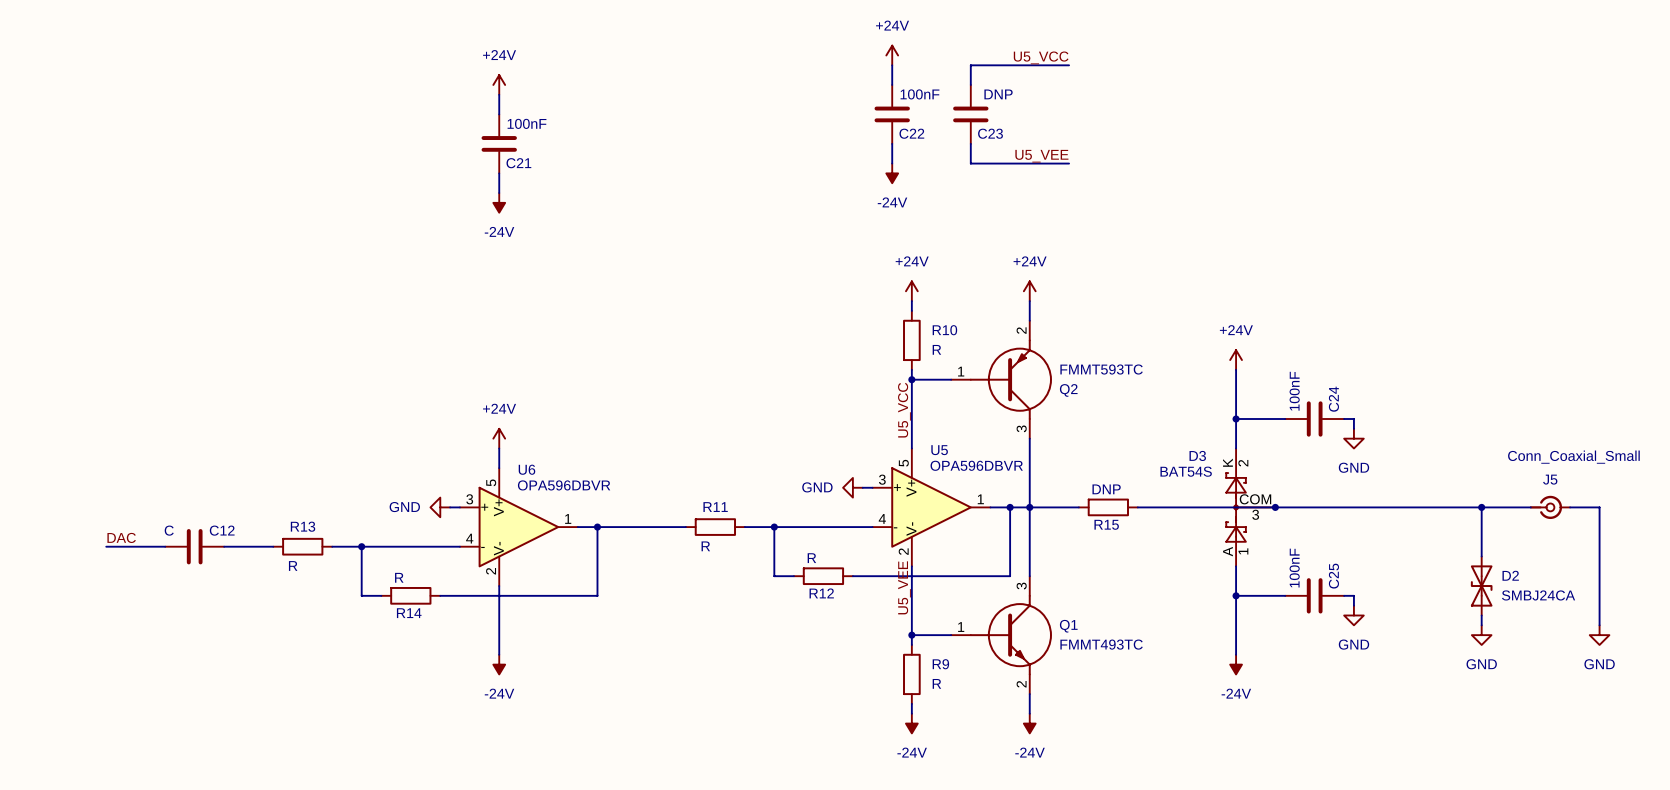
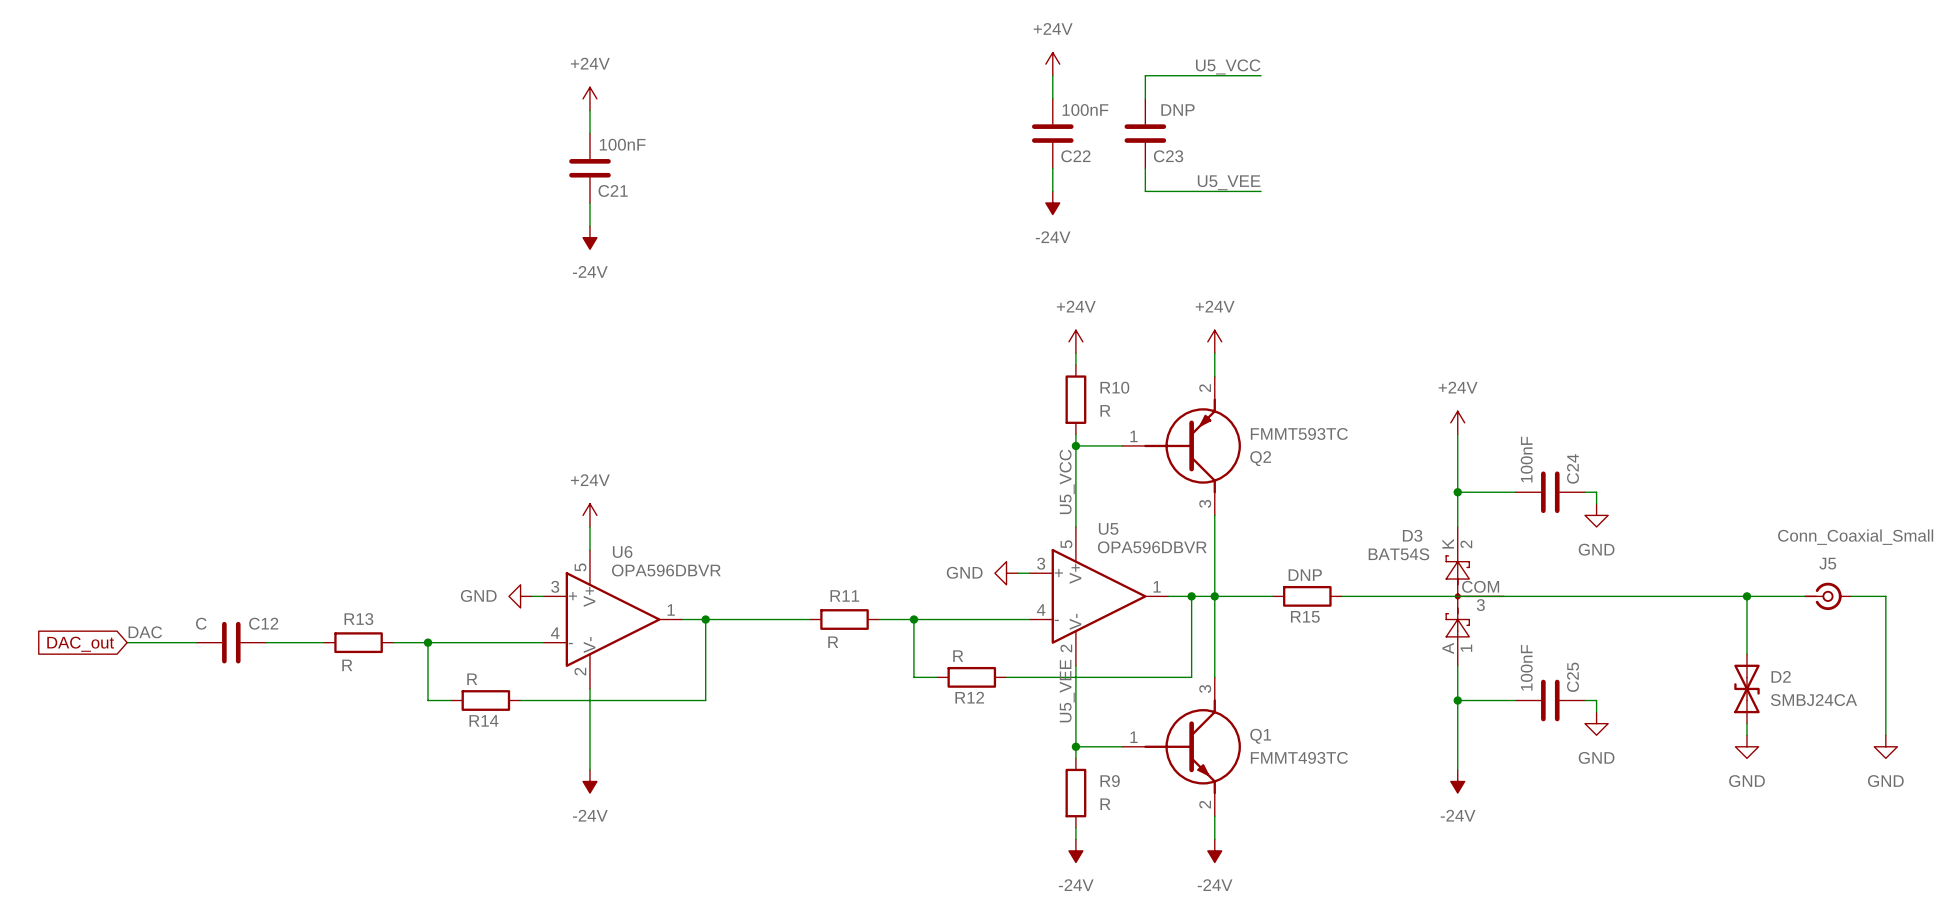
junction: (1275, 507) -> none
global label: none -> DAC_out (80, 644)

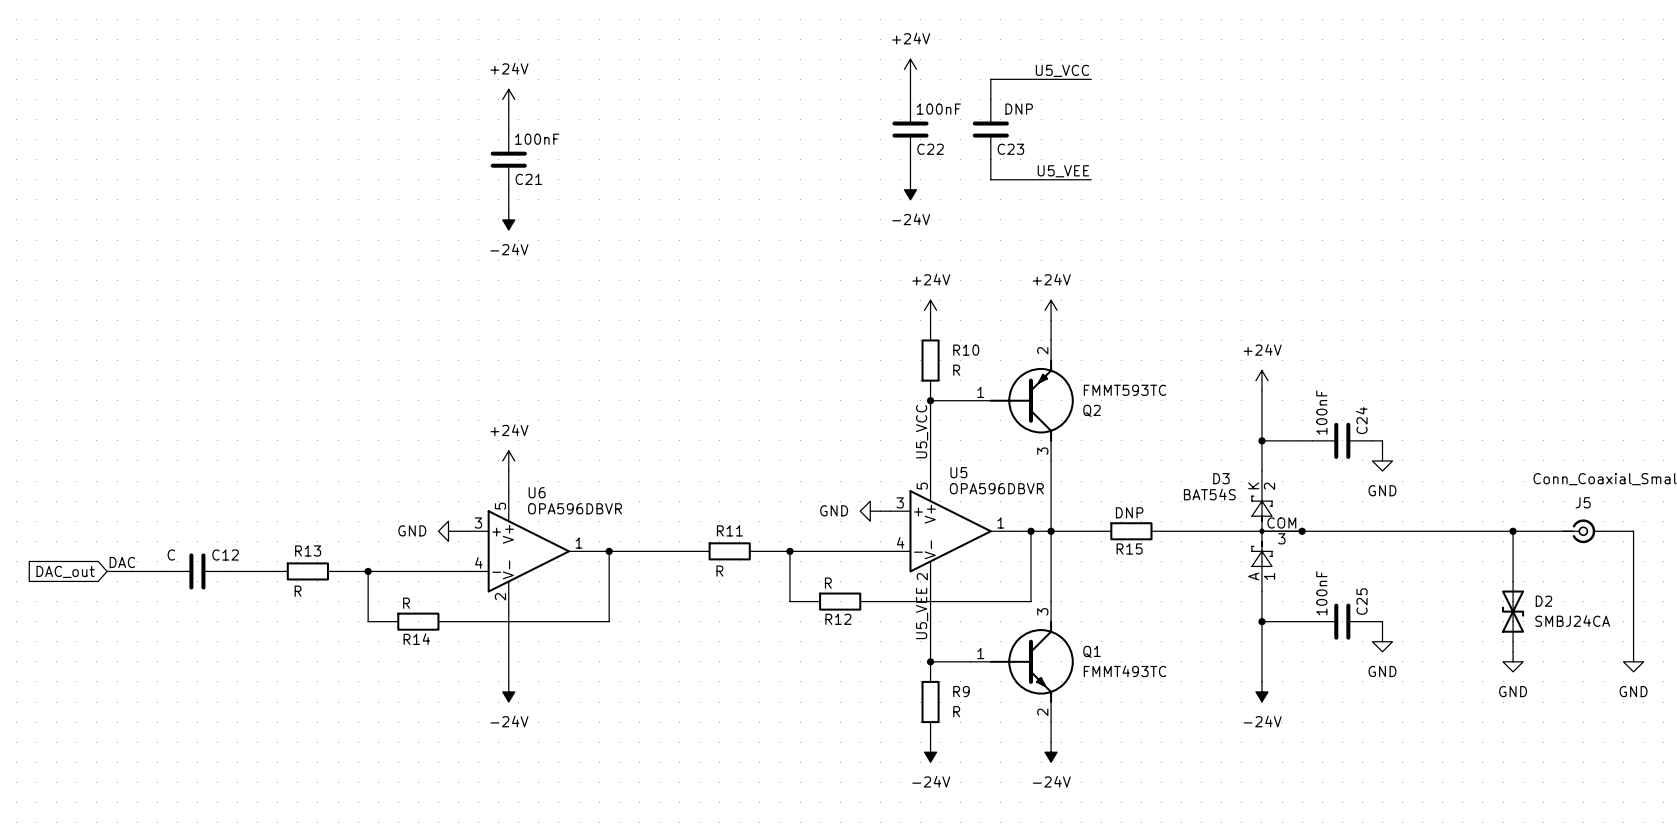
junction: none -> (1302, 531)

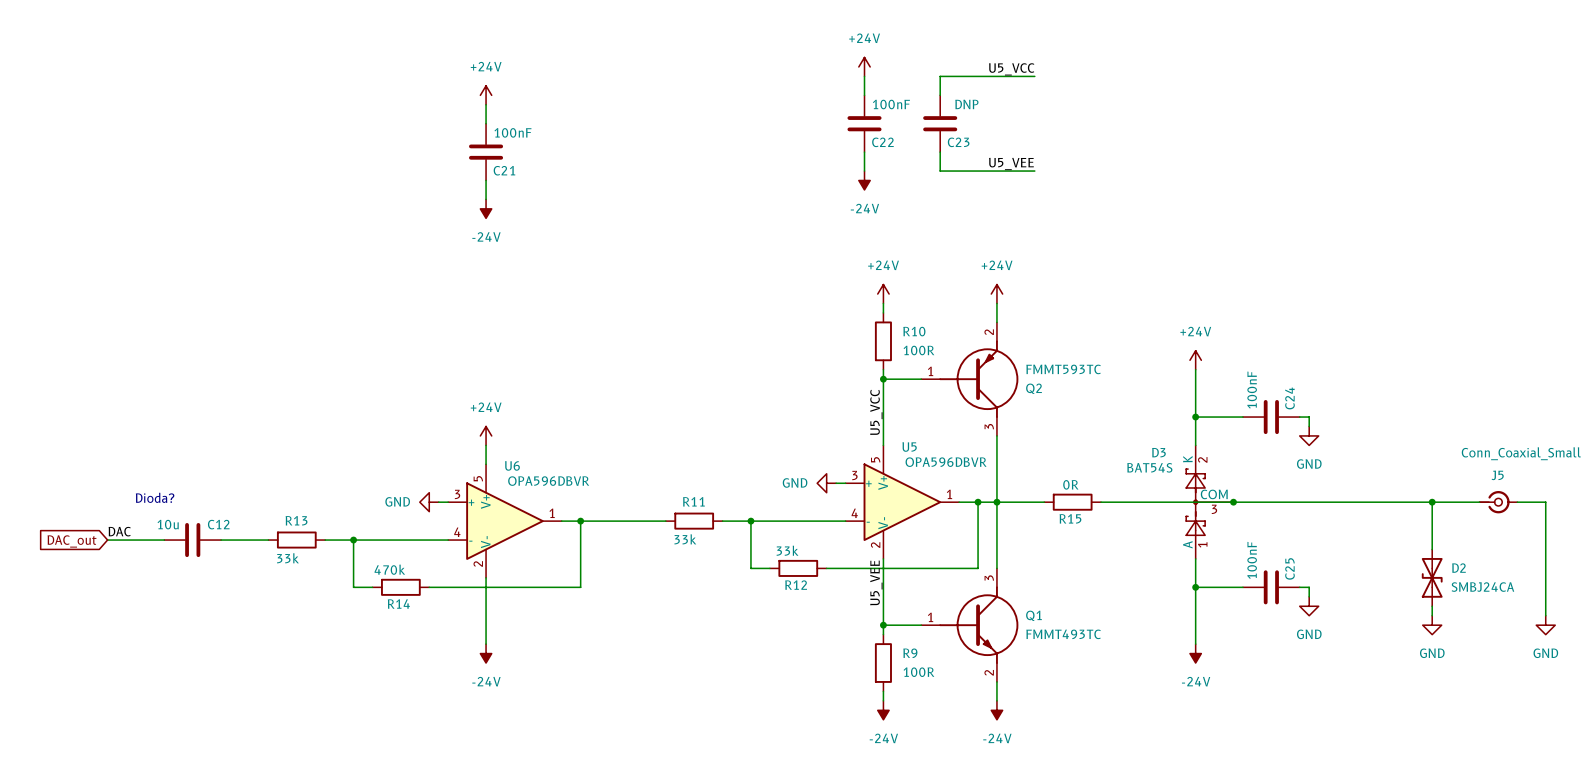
R10 value: R (956, 370) -> 100R (918, 350)
R15 value: DNP (1129, 512) -> 0R (1070, 484)
text: none -> Dioda? (155, 497)
C12 value: C (171, 555) -> 10u (168, 524)
R11 value: R (719, 571) -> 33k (685, 539)
R12 value: R (828, 583) -> 33k (787, 550)
R13 value: R (298, 591) -> 33k (287, 558)
R14 value: R (406, 603) -> 470k (389, 569)
R9 value: R (956, 711) -> 100R (918, 672)

